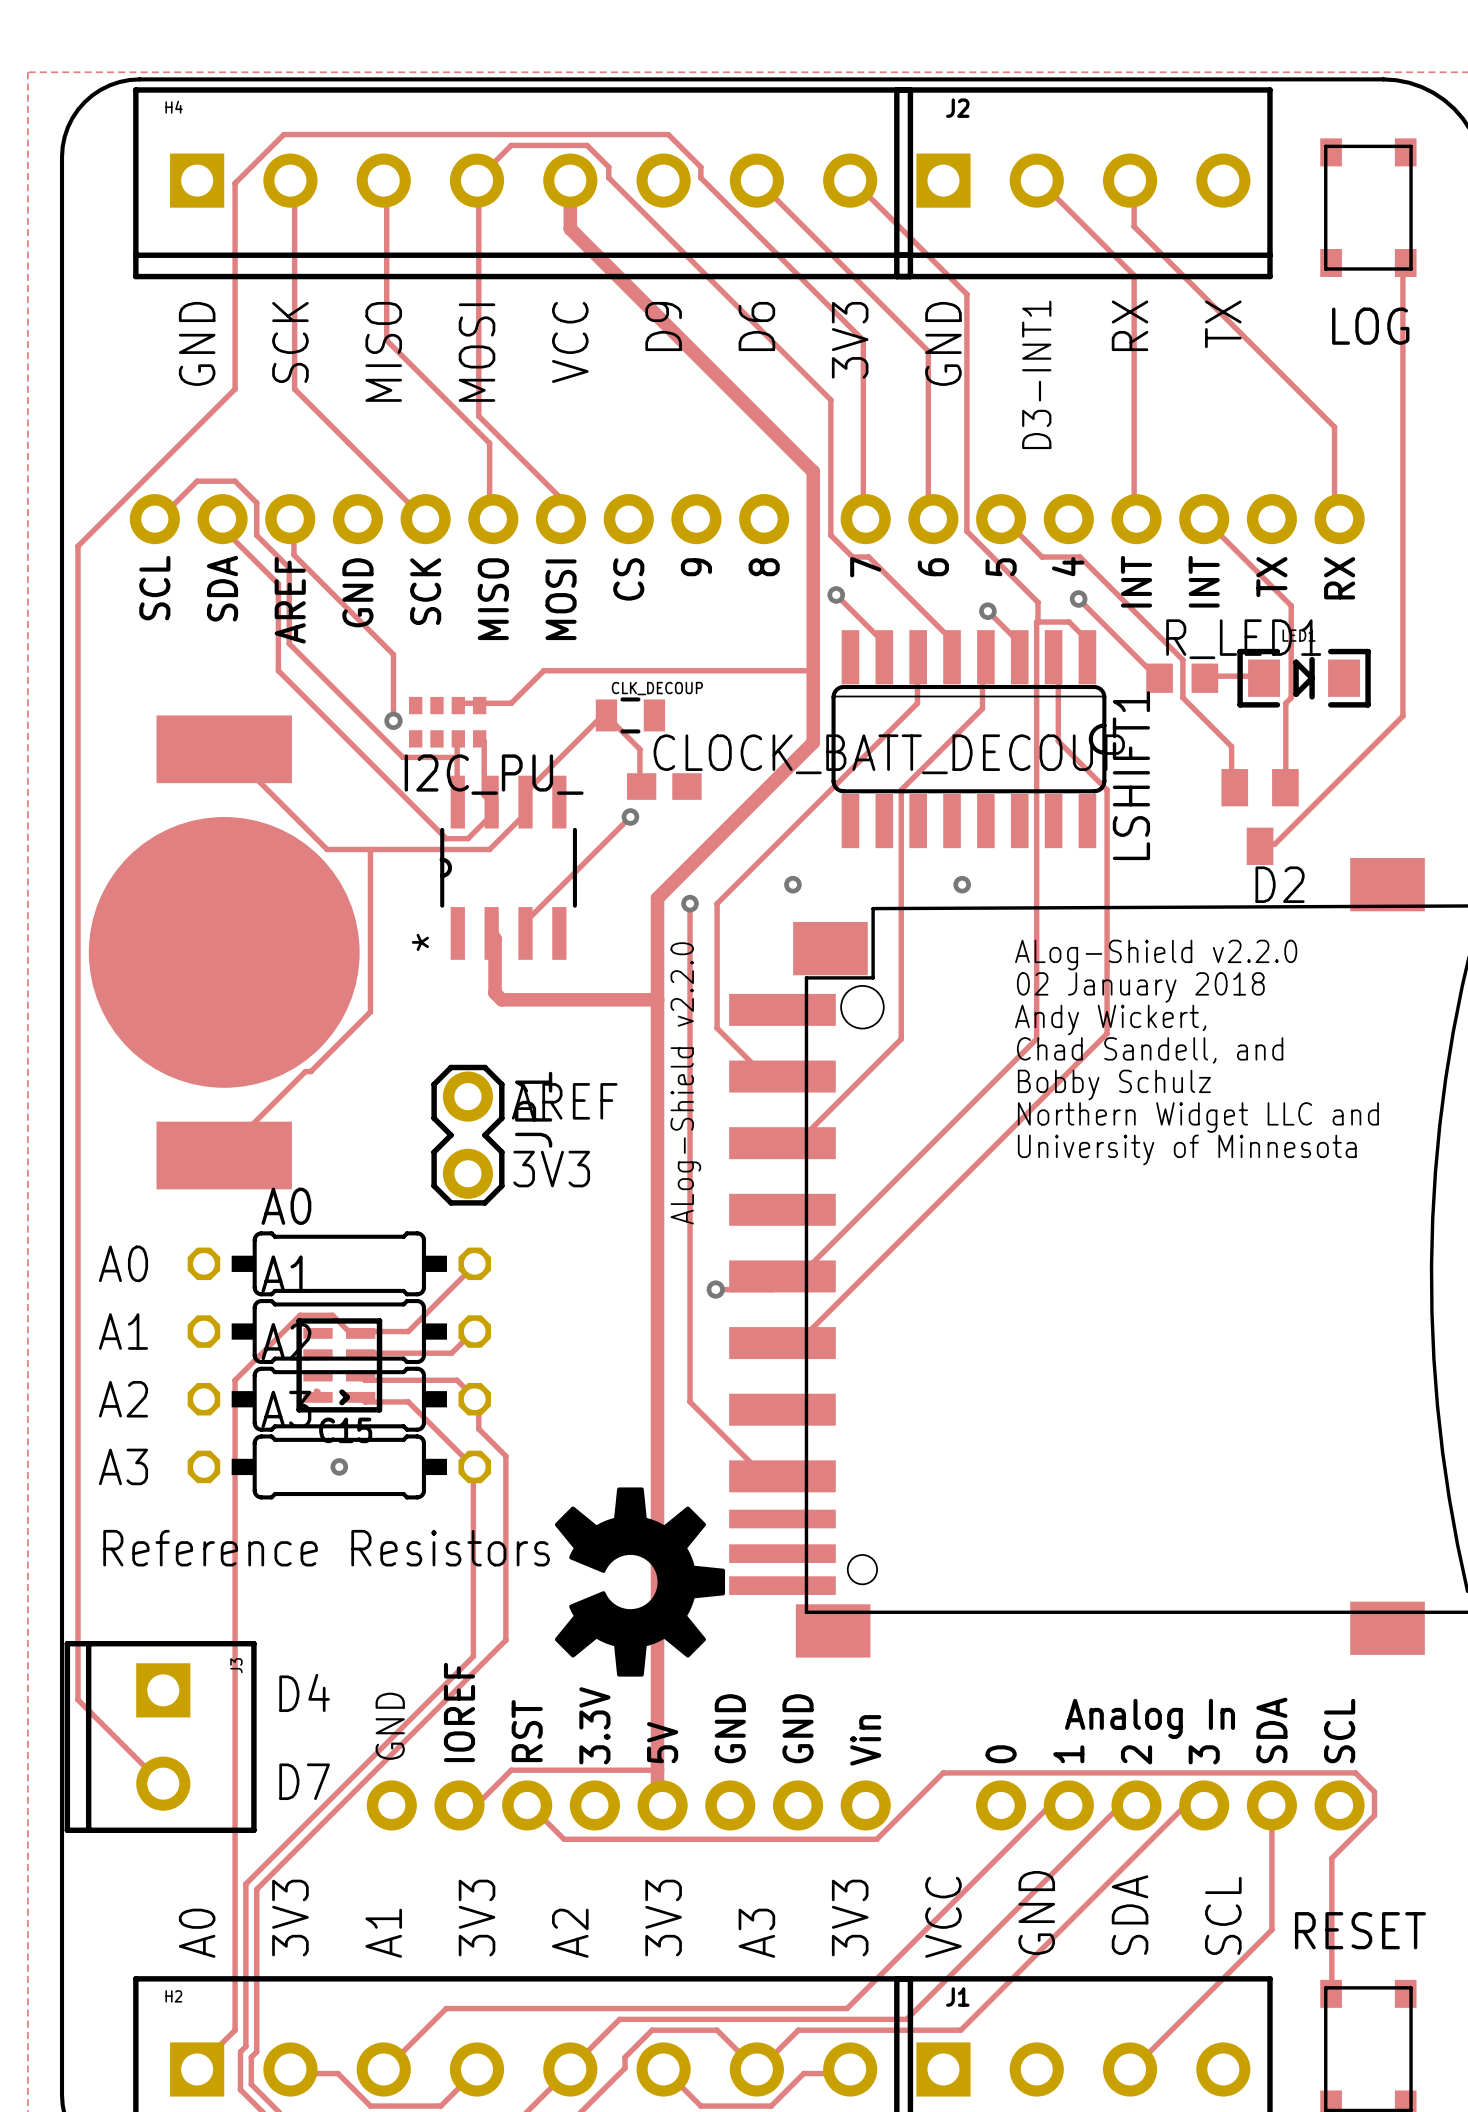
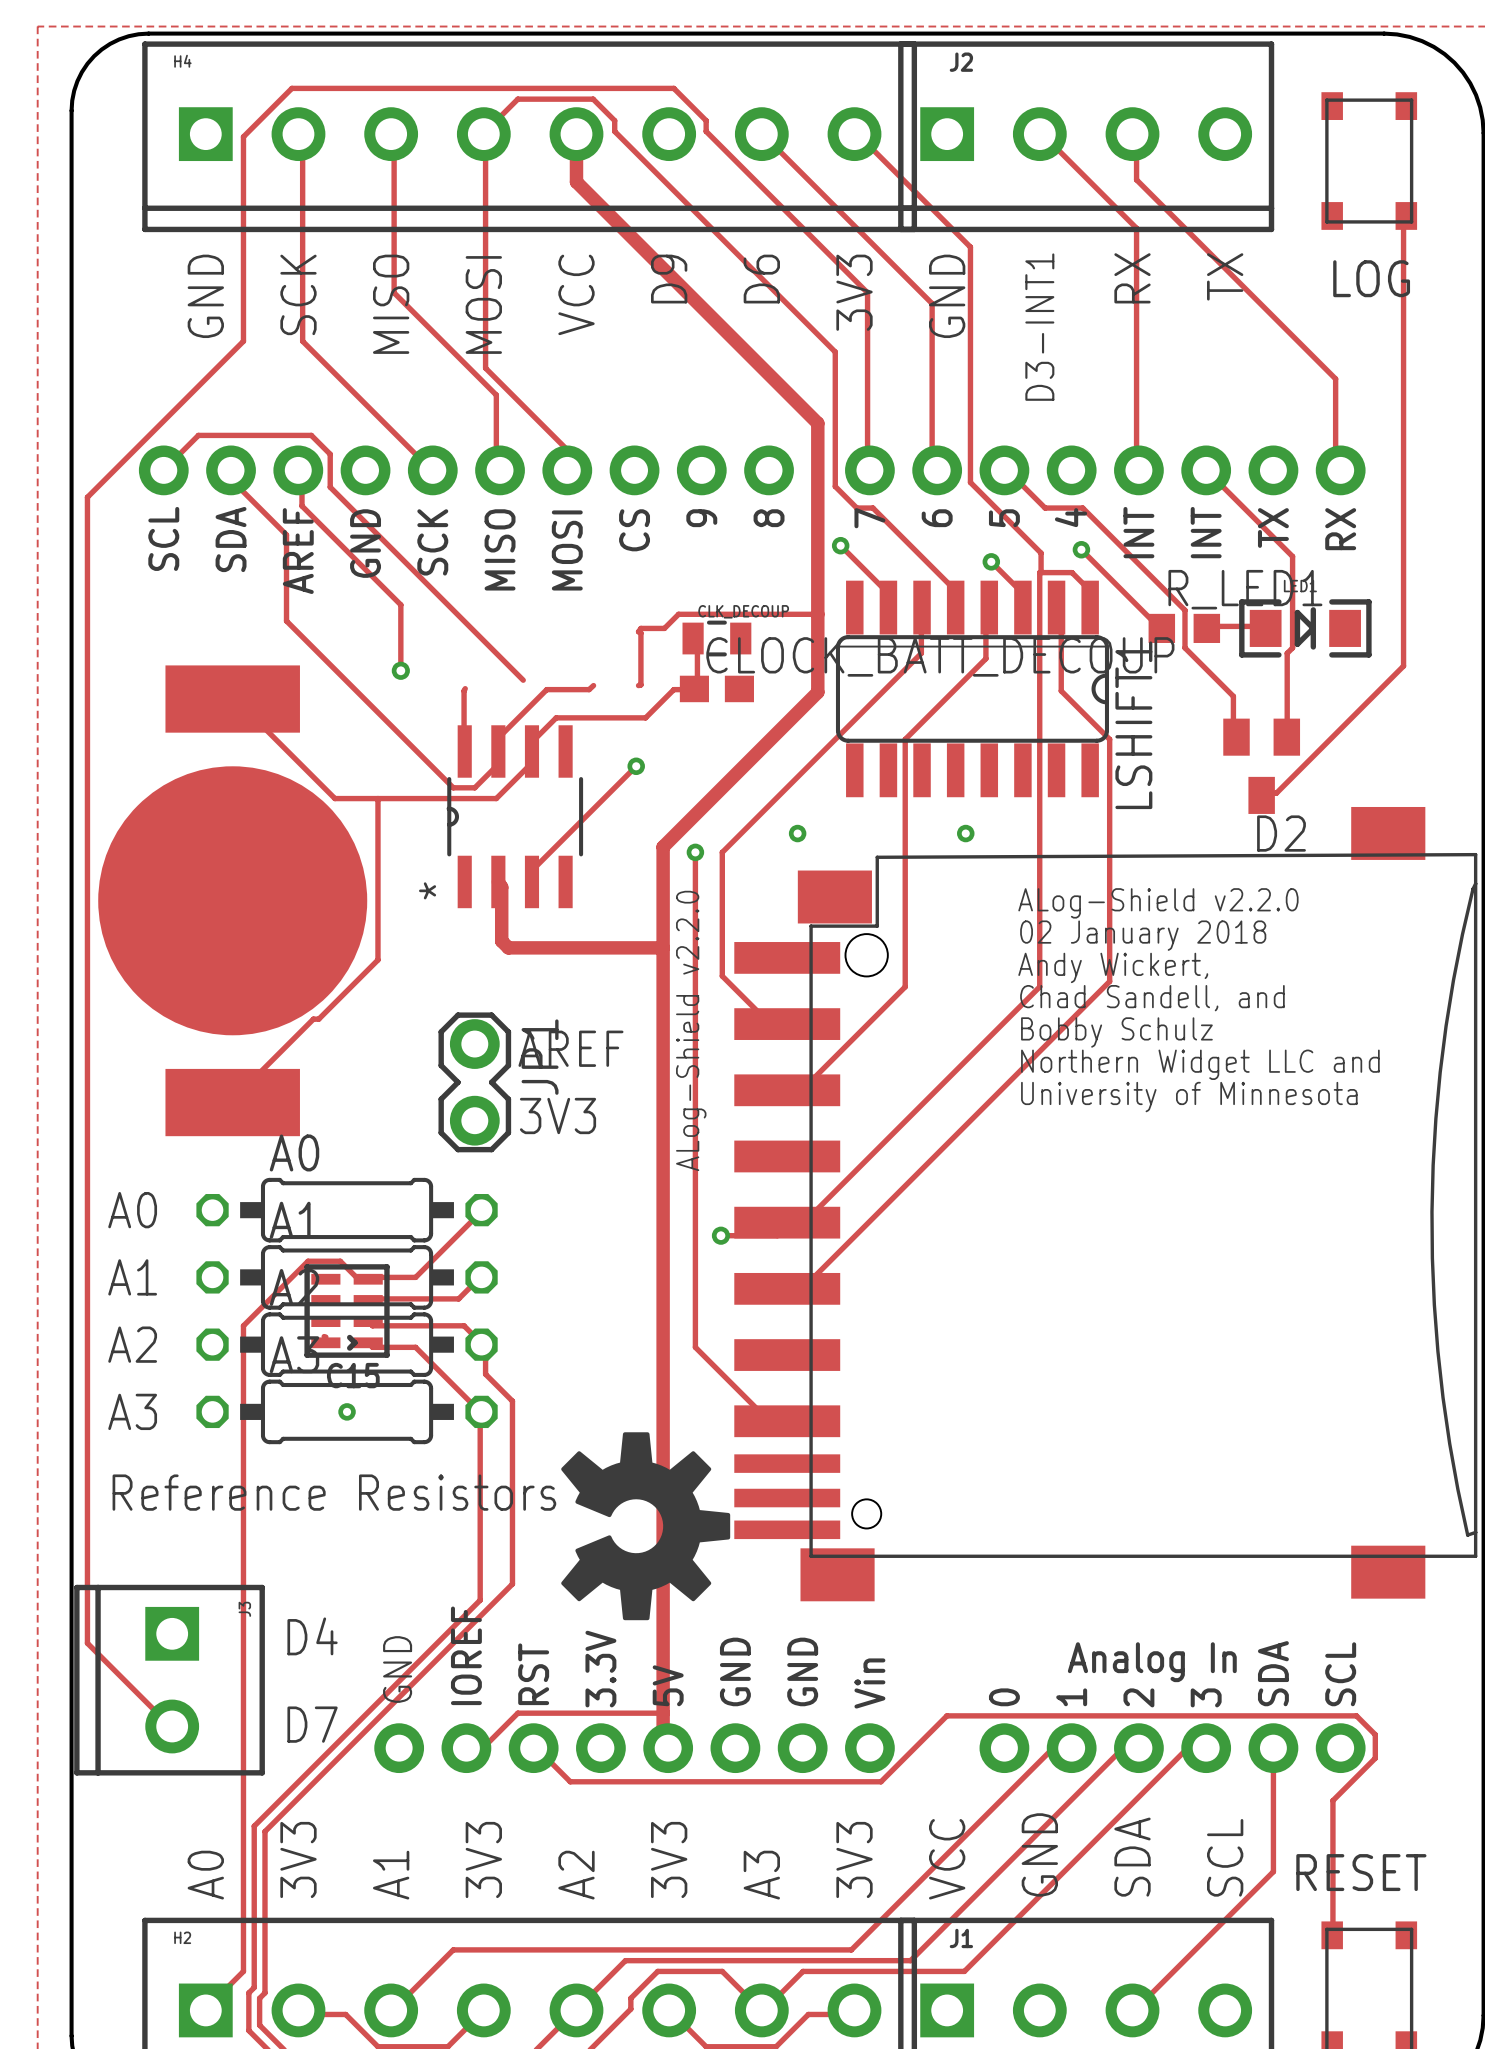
track: (154, 519) (159, 519) (197, 481) (235, 481) (256, 502) (256, 535) (289, 567) (289, 643) (402, 757) (457, 757) -> (163, 470) (198, 435) (311, 435) (330, 454) (330, 487) (523, 680)
track: none -> (817, 614) (678, 614) (664, 628) (640, 628) (638, 631) (640, 633) (640, 684) (638, 685)
track: (813, 670) (543, 670) (511, 703) (484, 703) (479, 705) (478, 703) (462, 703) (458, 705) -> none
CLK_DECOUP position: (630, 715) -> (716, 638)
I2C_PU_: (447, 722) -> none
track: (479, 738) (484, 741) (484, 795) (491, 802) -> (593, 685) (589, 689) (546, 689) (499, 736) (498, 751)
track: (549, 768) (602, 716) (606, 715) (639, 749) (639, 782) (641, 786) -> (556, 717) (645, 717) (673, 689) (692, 689) (697, 684) (697, 642) (693, 638)
CLOCK_BATT_DECOUP position: (664, 786) -> (716, 688)

